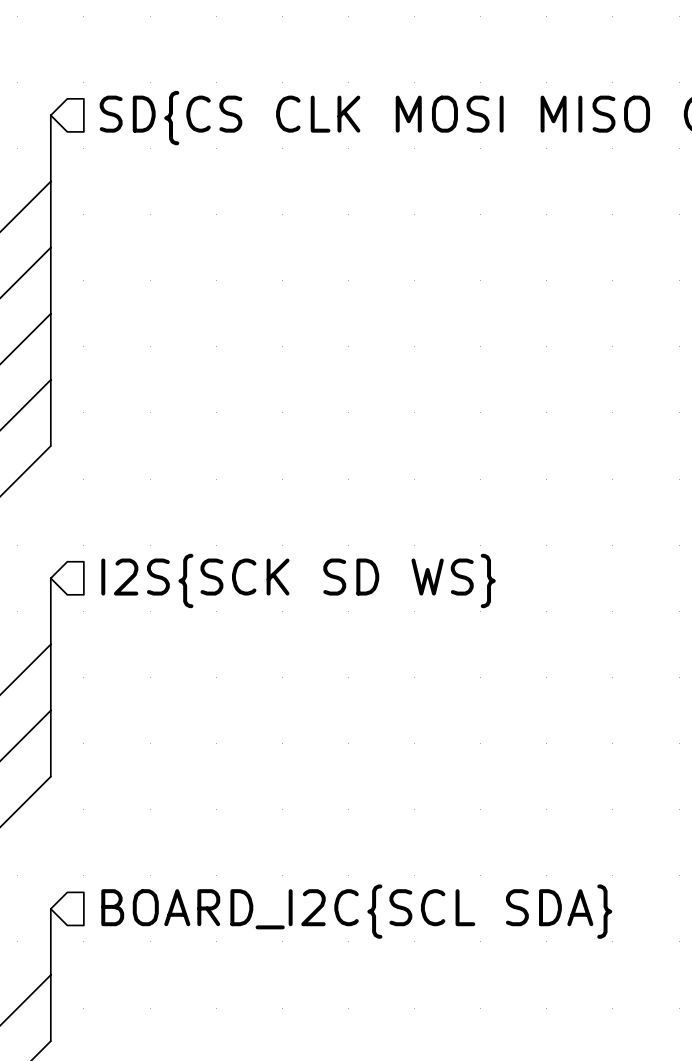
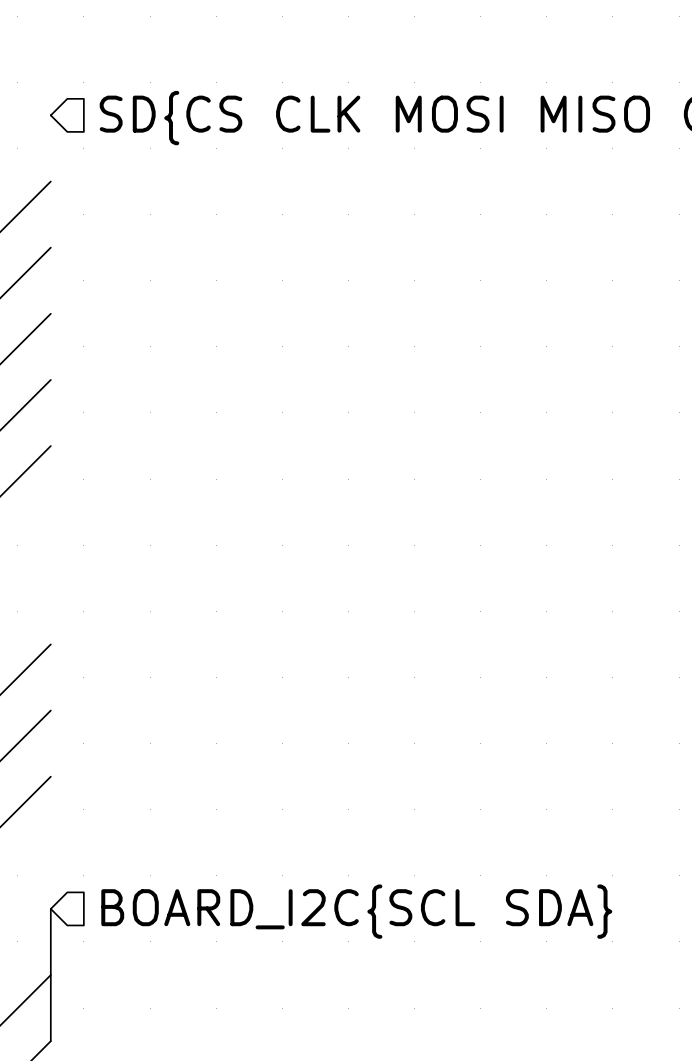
bus: (50, 115) (50, 446) -> none
bus: (50, 578) (50, 776) -> none
hierarchical label: I2S{SCK SD WS} (298, 580) -> none

